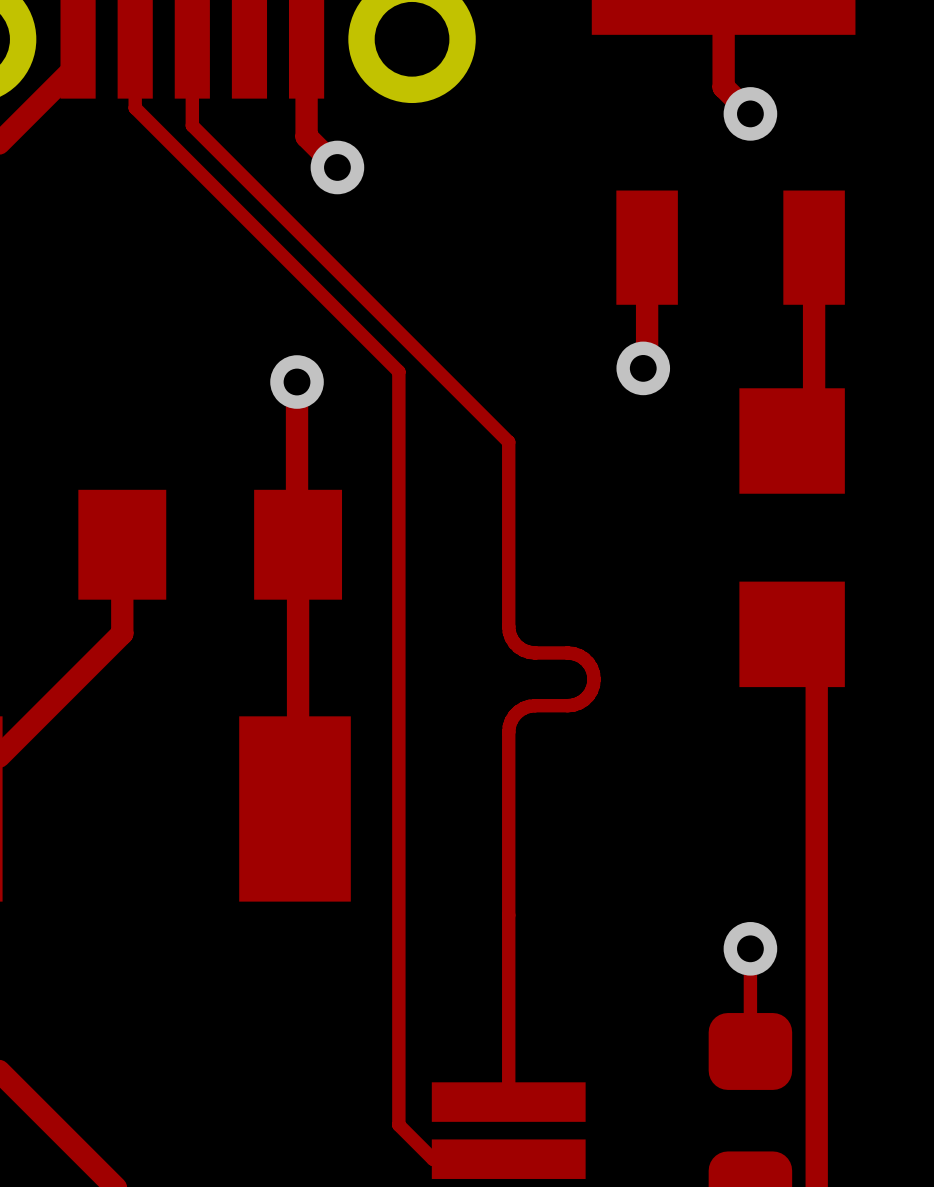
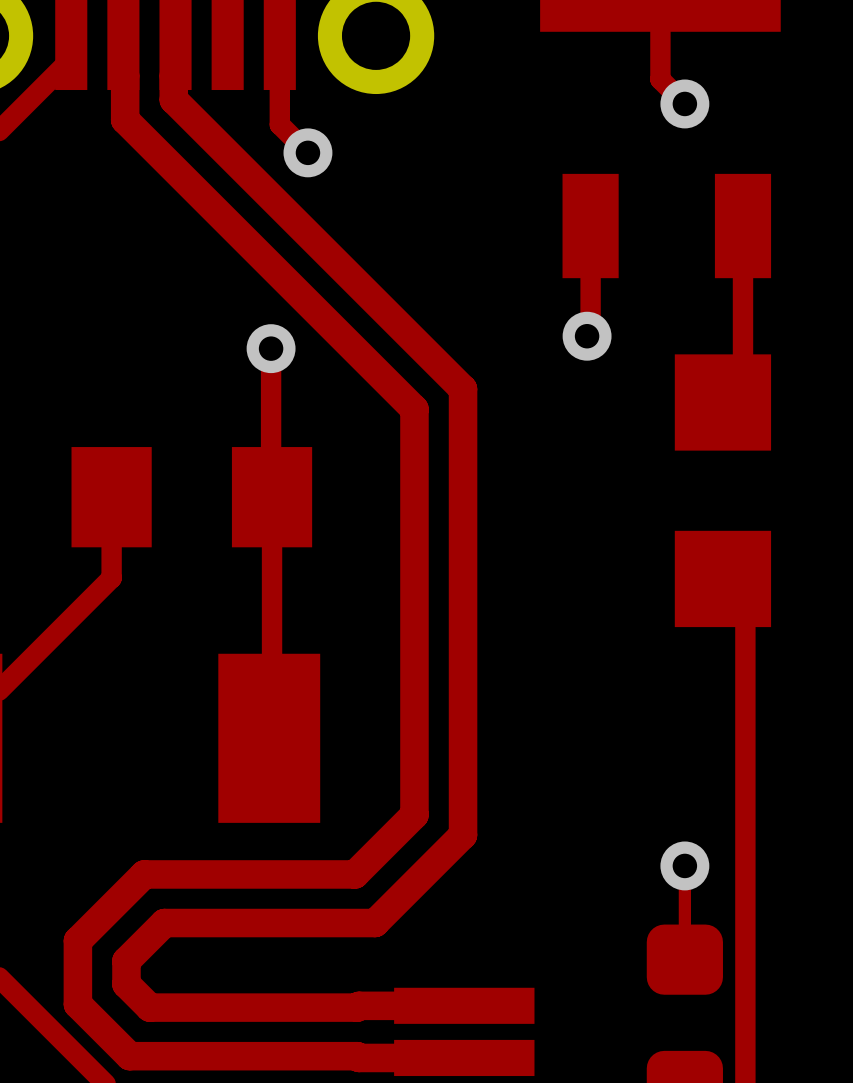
top track: (135, 81) (135, 108) (398, 371) (398, 1125) (433, 1159) -> (123, 73) (125, 75) (125, 119) (414, 409) (414, 814) (354, 874) (144, 874) (77, 940) (77, 1004) (129, 1056) (357, 1056) (359, 1057) (395, 1057)
top track: (192, 81) (192, 125) (508, 442) (508, 626) (511, 638) (518, 647) (529, 652) (567, 652) (579, 655) (588, 662) (593, 673) (591, 690) (579, 703) (567, 705) (529, 706) (518, 711) (509, 726) (508, 1102) -> (175, 73) (173, 75) (173, 99) (463, 389) (463, 835) (375, 923) (164, 923) (126, 960) (126, 984) (149, 1007) (464, 1005)

